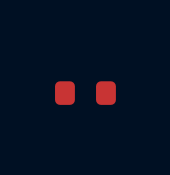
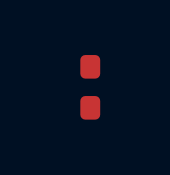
part footprint: [55, 81, 116, 105] -> [80, 55, 101, 120]

